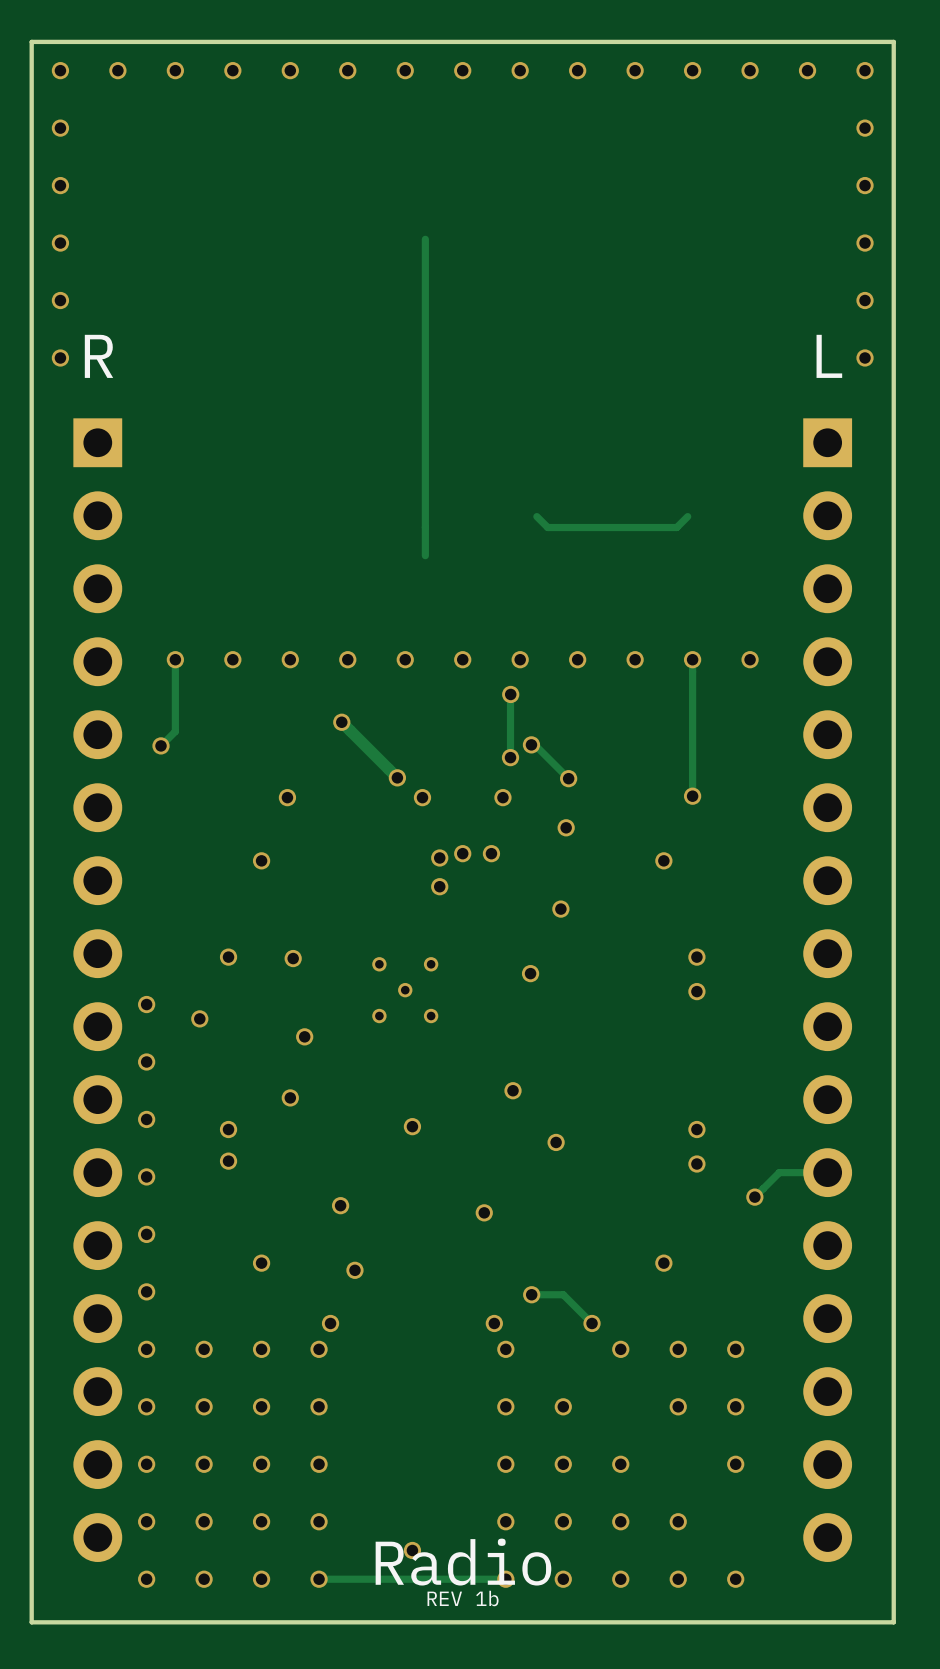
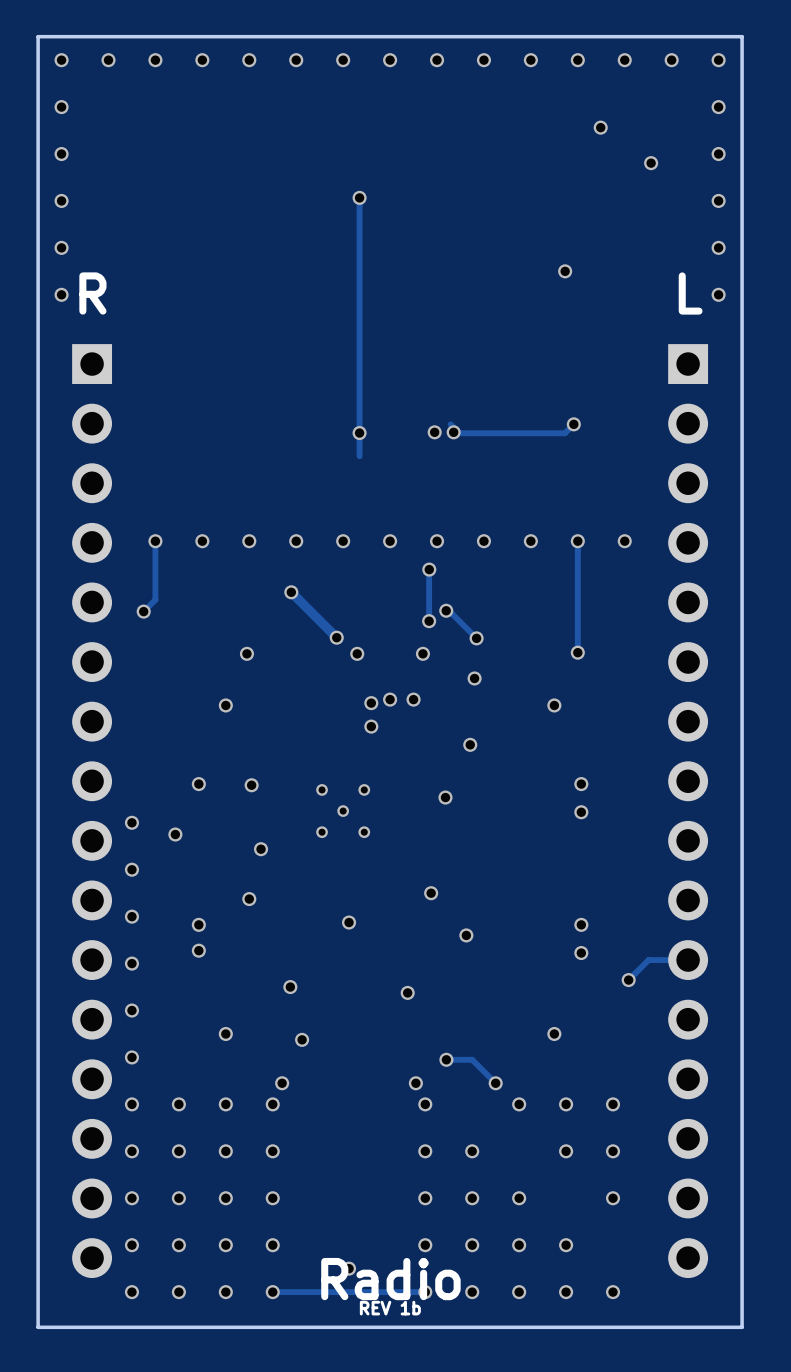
via: none -> (600, 127)
via: none -> (651, 163)
via: none -> (359, 197)
via: none -> (565, 271)
via: none -> (573, 424)
via: none -> (434, 432)
via: none -> (453, 432)
via: none -> (359, 433)

